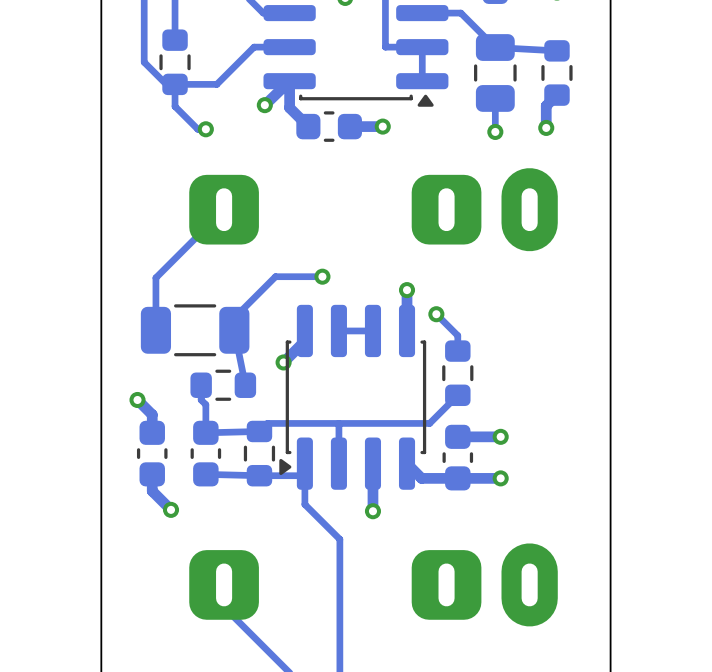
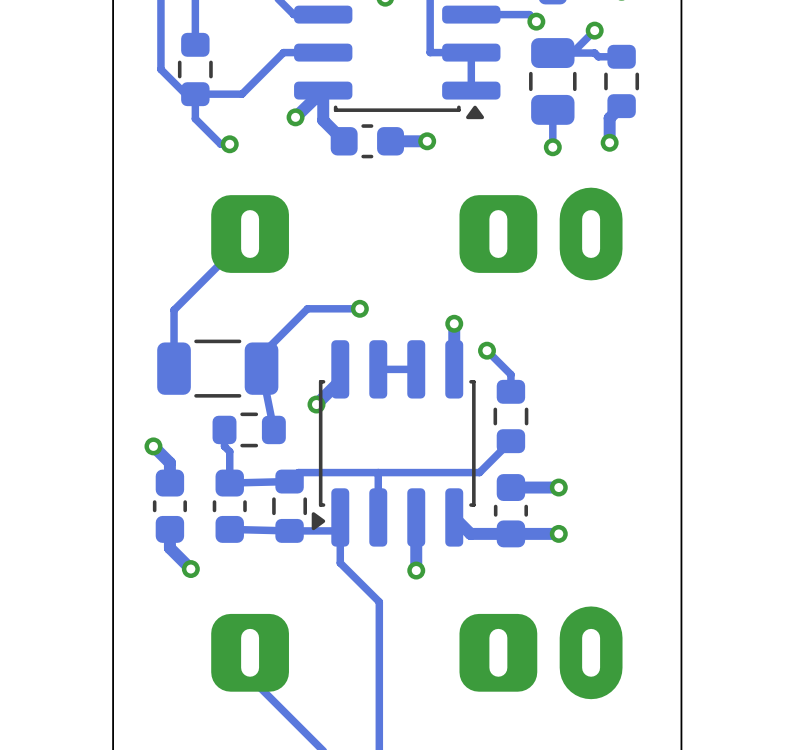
track: (460, 13) (495, 47) (556, 50) -> (552, 53) (594, 53) (598, 56) (621, 56)
track: none -> (514, 14) (529, 14) (536, 21)
via: none -> (536, 21)
track: none -> (594, 30) (572, 53)
via: none -> (594, 30)

